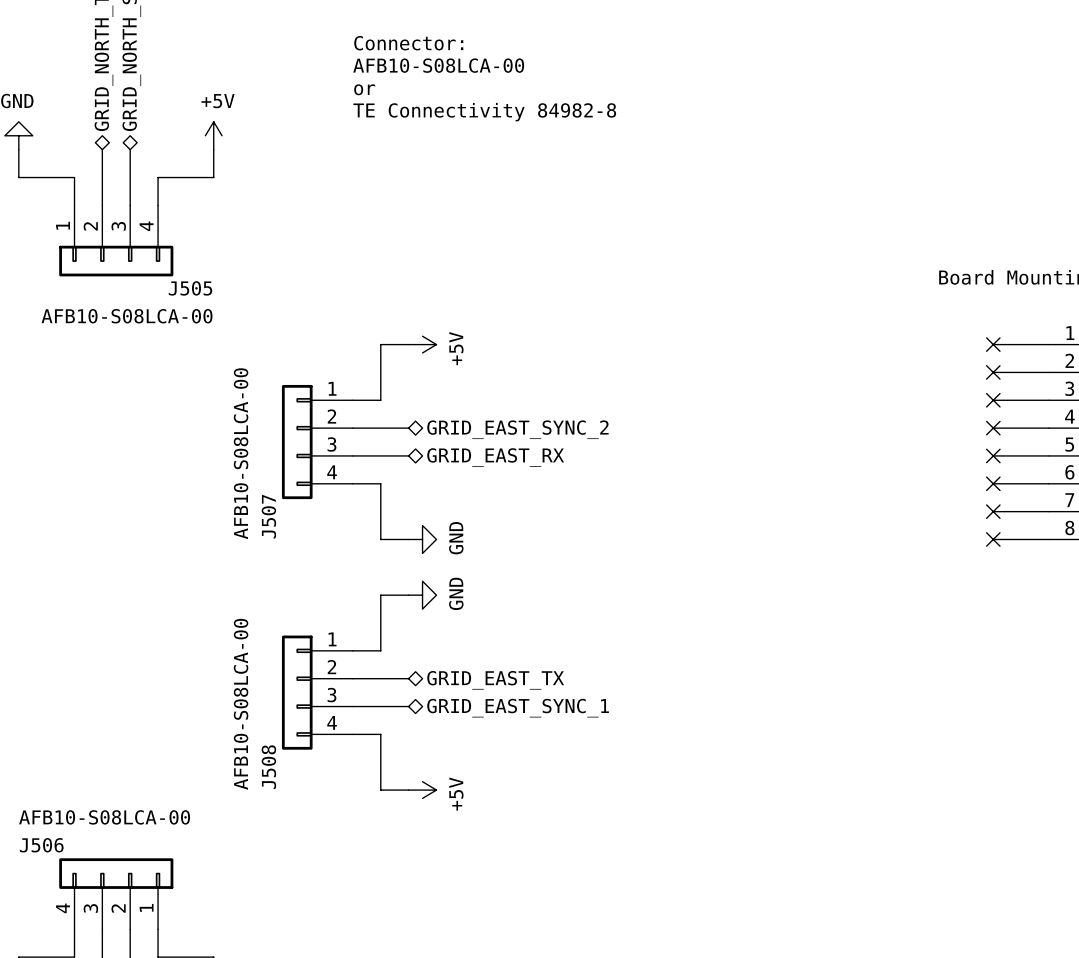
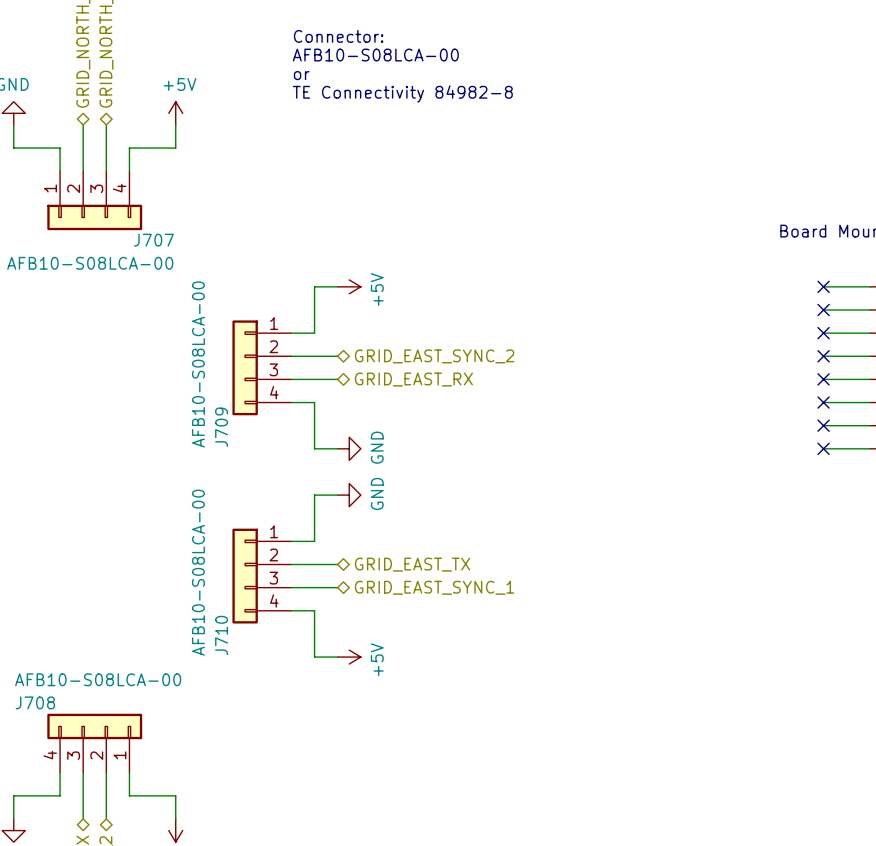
J505 name: J505 (190, 288) -> J707 (153, 240)
J507 name: J507 (268, 516) -> J709 (221, 427)
J508 name: J508 (268, 767) -> J710 (221, 635)
J506 name: J506 (41, 845) -> J708 (35, 702)

